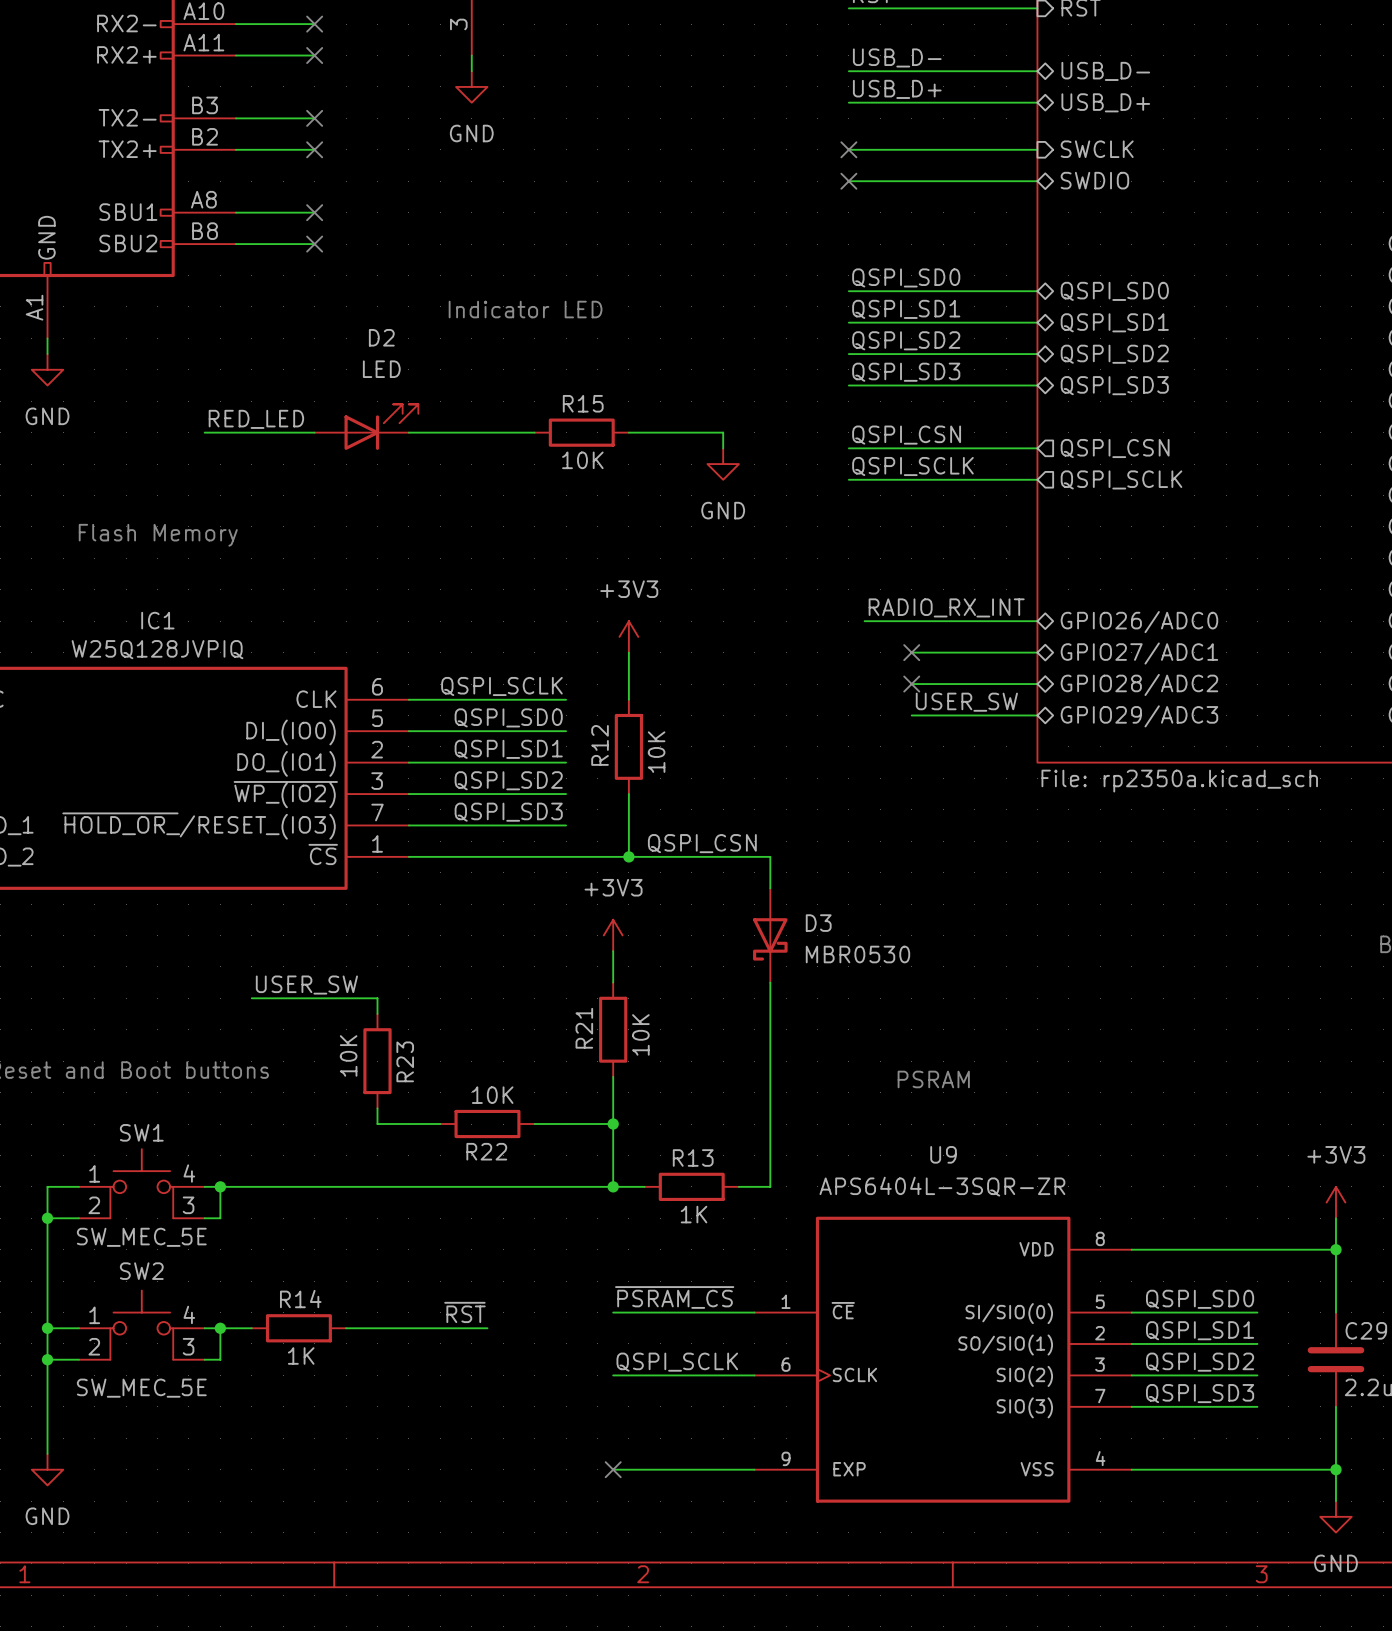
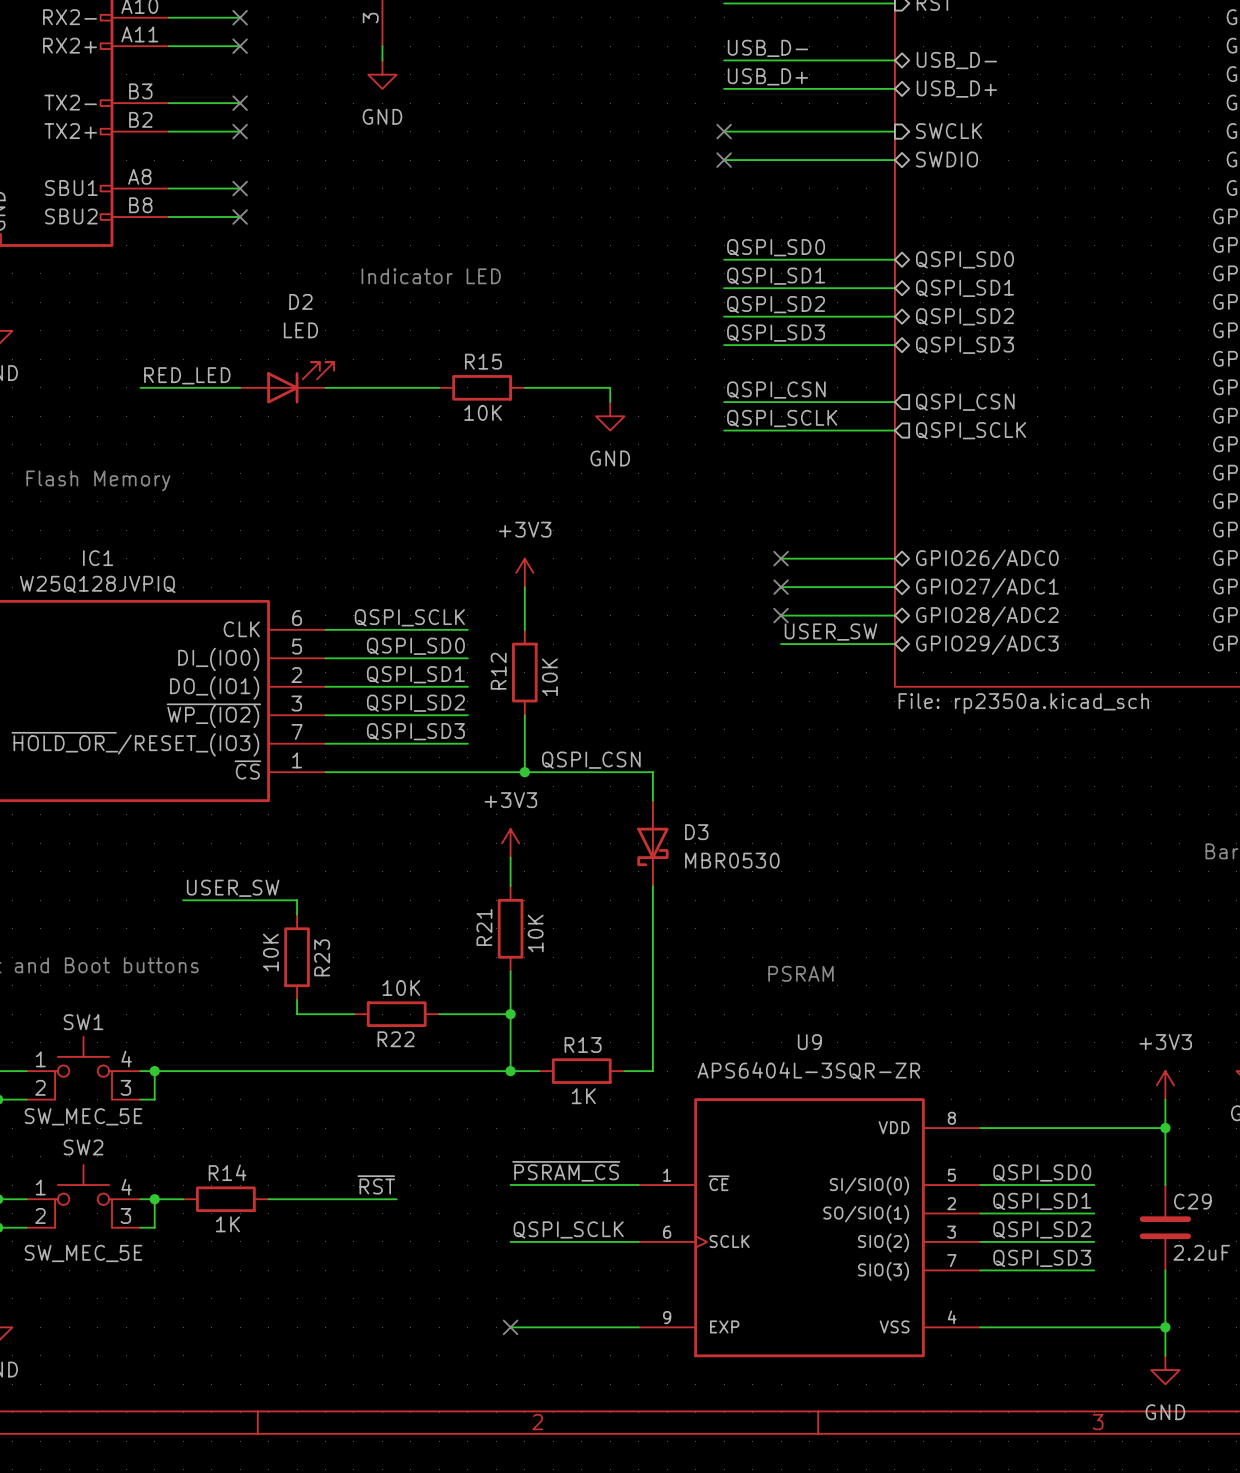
label: RADIO_RX_INT (946, 607) -> none
wire: (864, 621) (911, 621) -> none
no-connect mark: none -> (781, 558)

